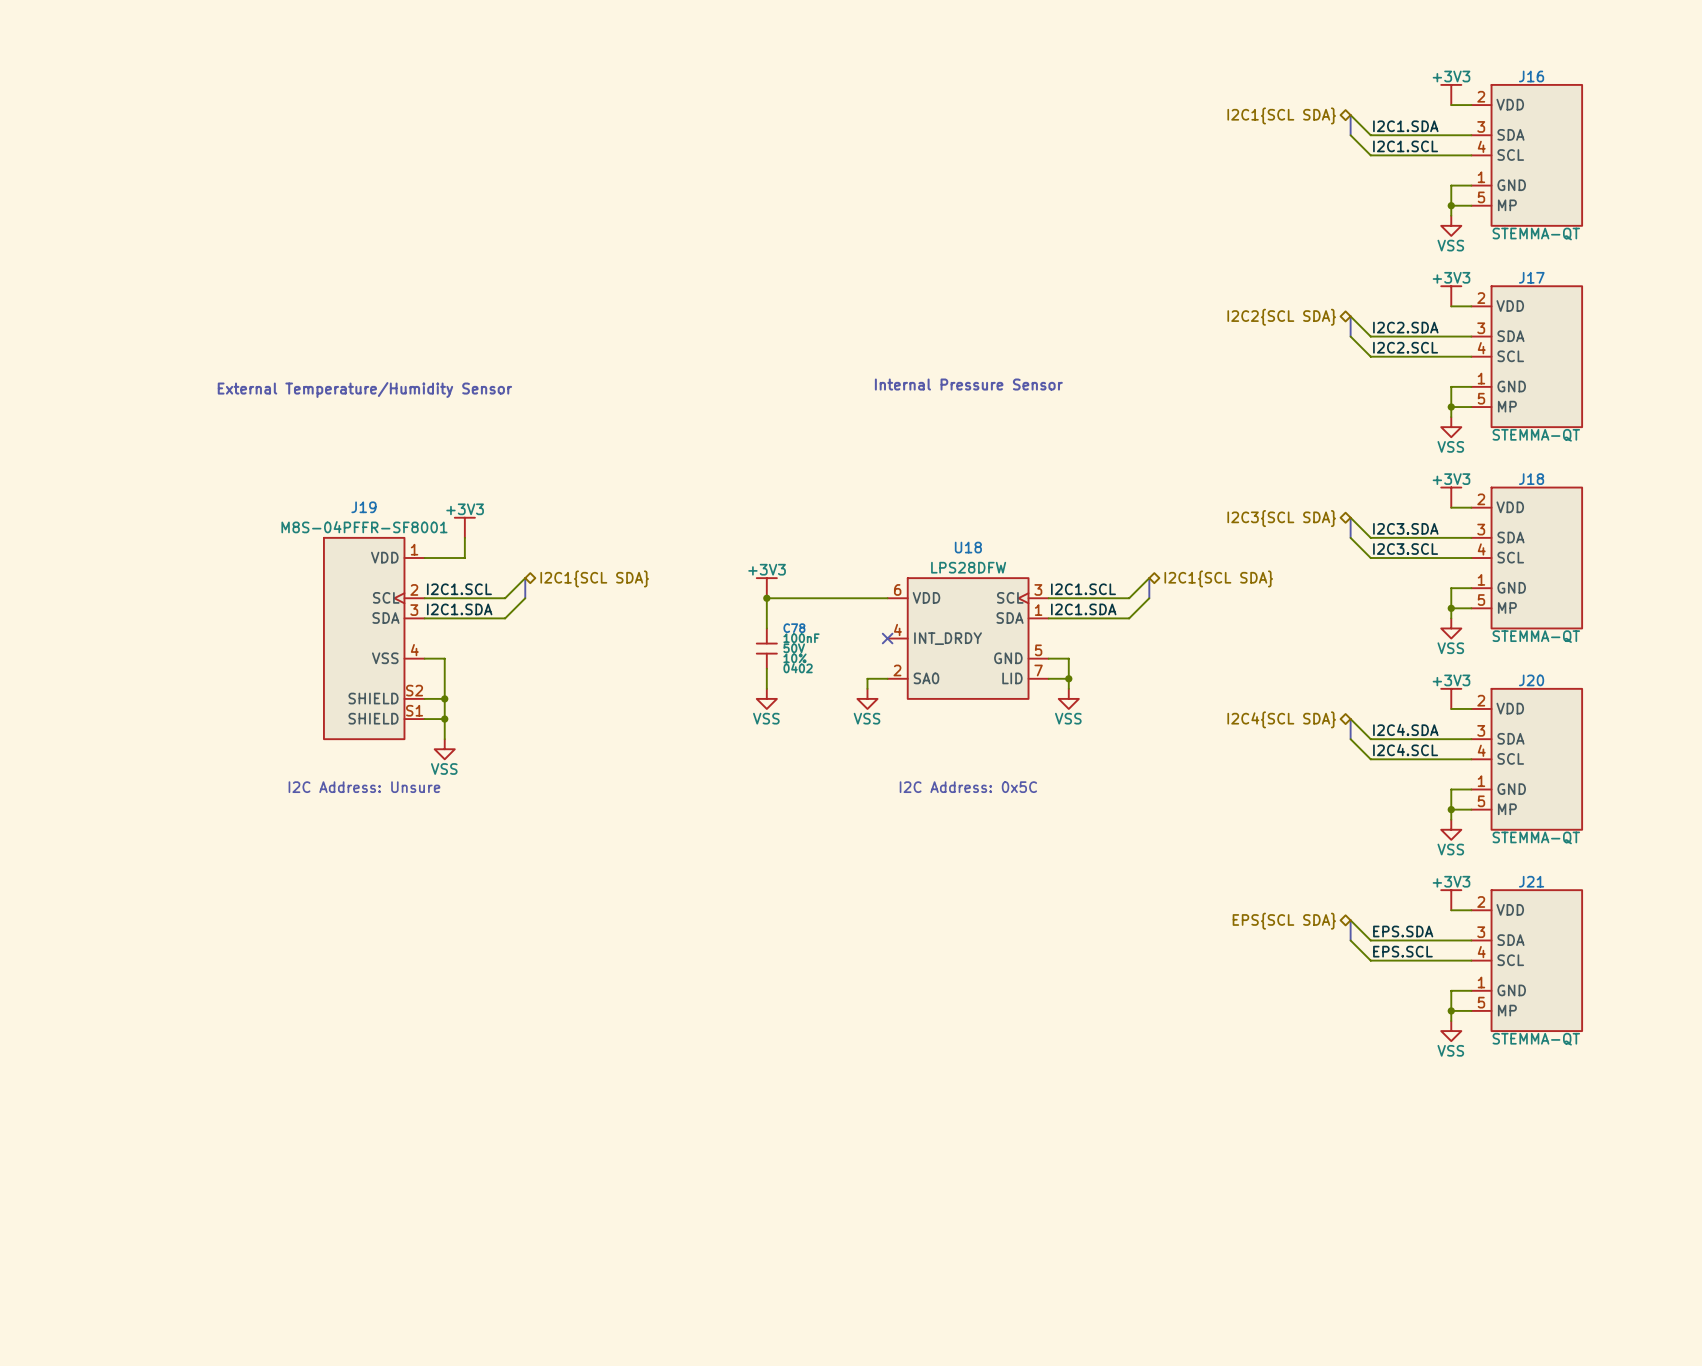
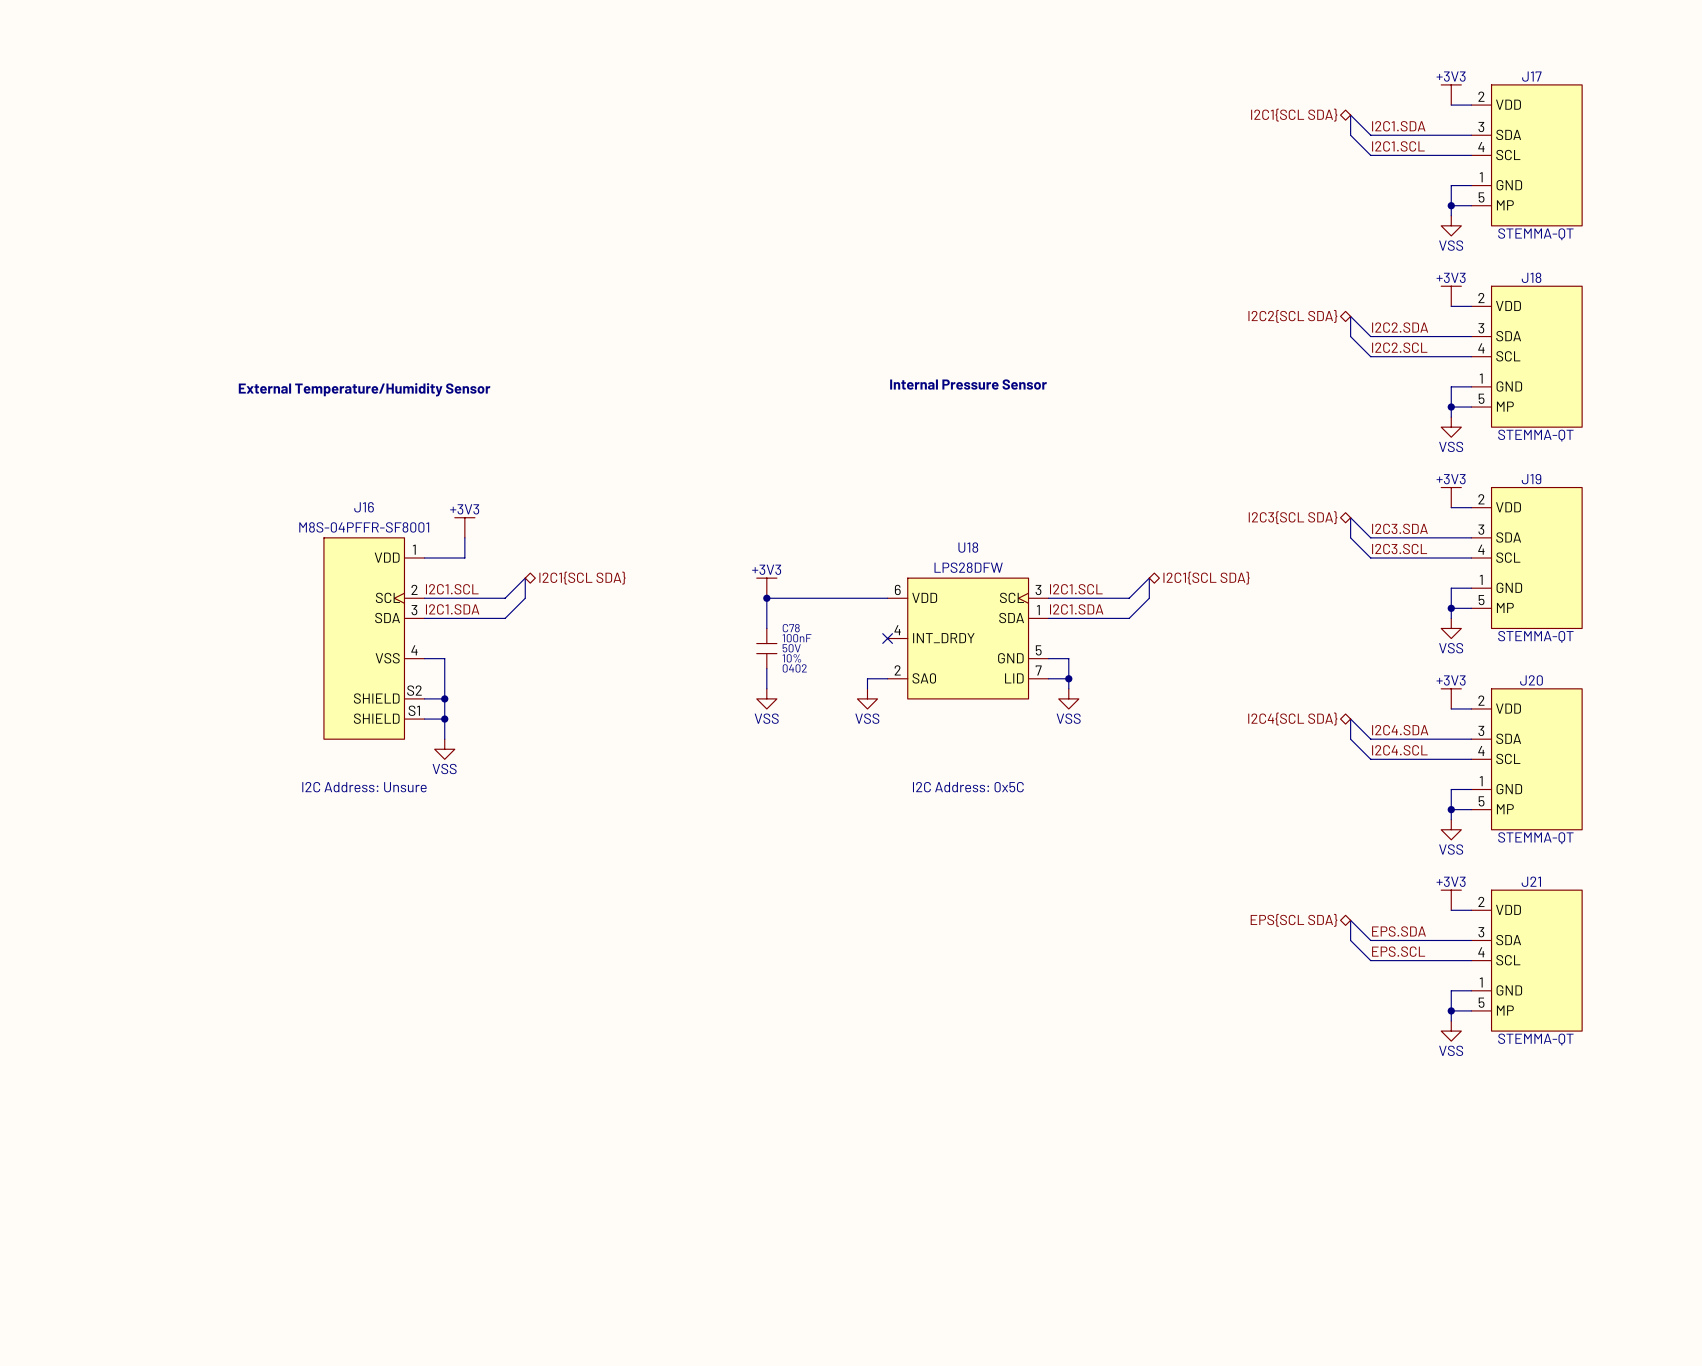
J16 name: J16 (1531, 76) -> J17 (1531, 76)
J17 name: J17 (1531, 277) -> J18 (1531, 277)
J18 name: J18 (1531, 479) -> J19 (1531, 479)
J19 name: J19 (363, 507) -> J16 (364, 507)

